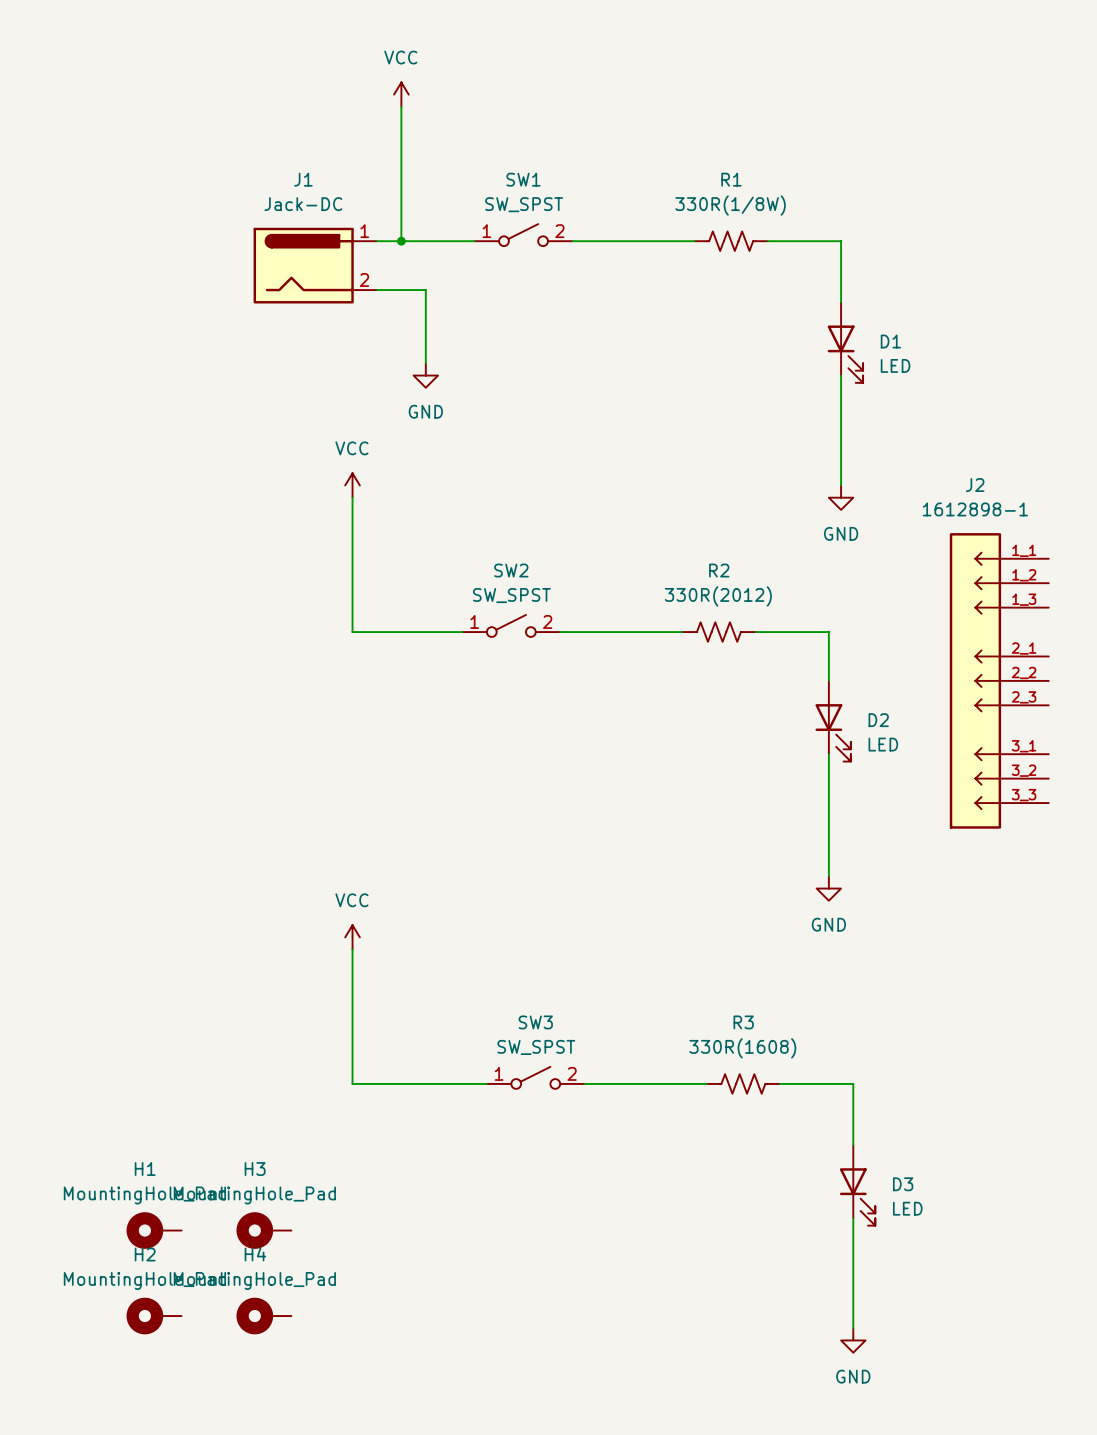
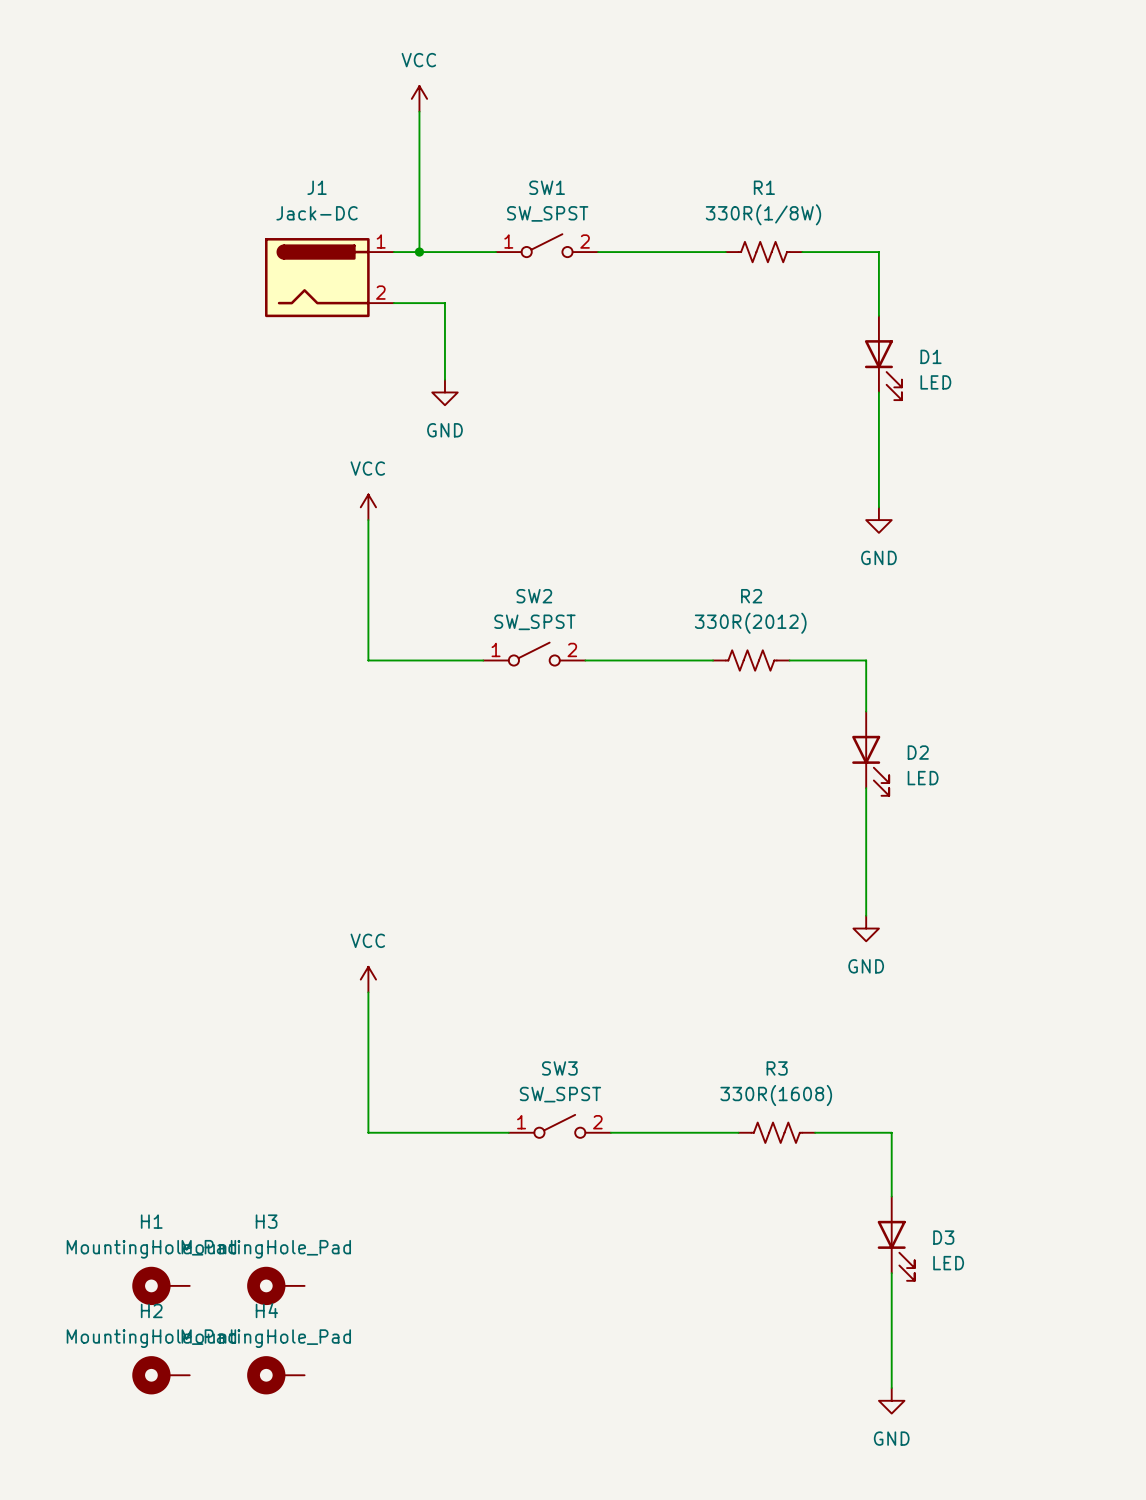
J2: 1612898-1 (999, 680) -> none

